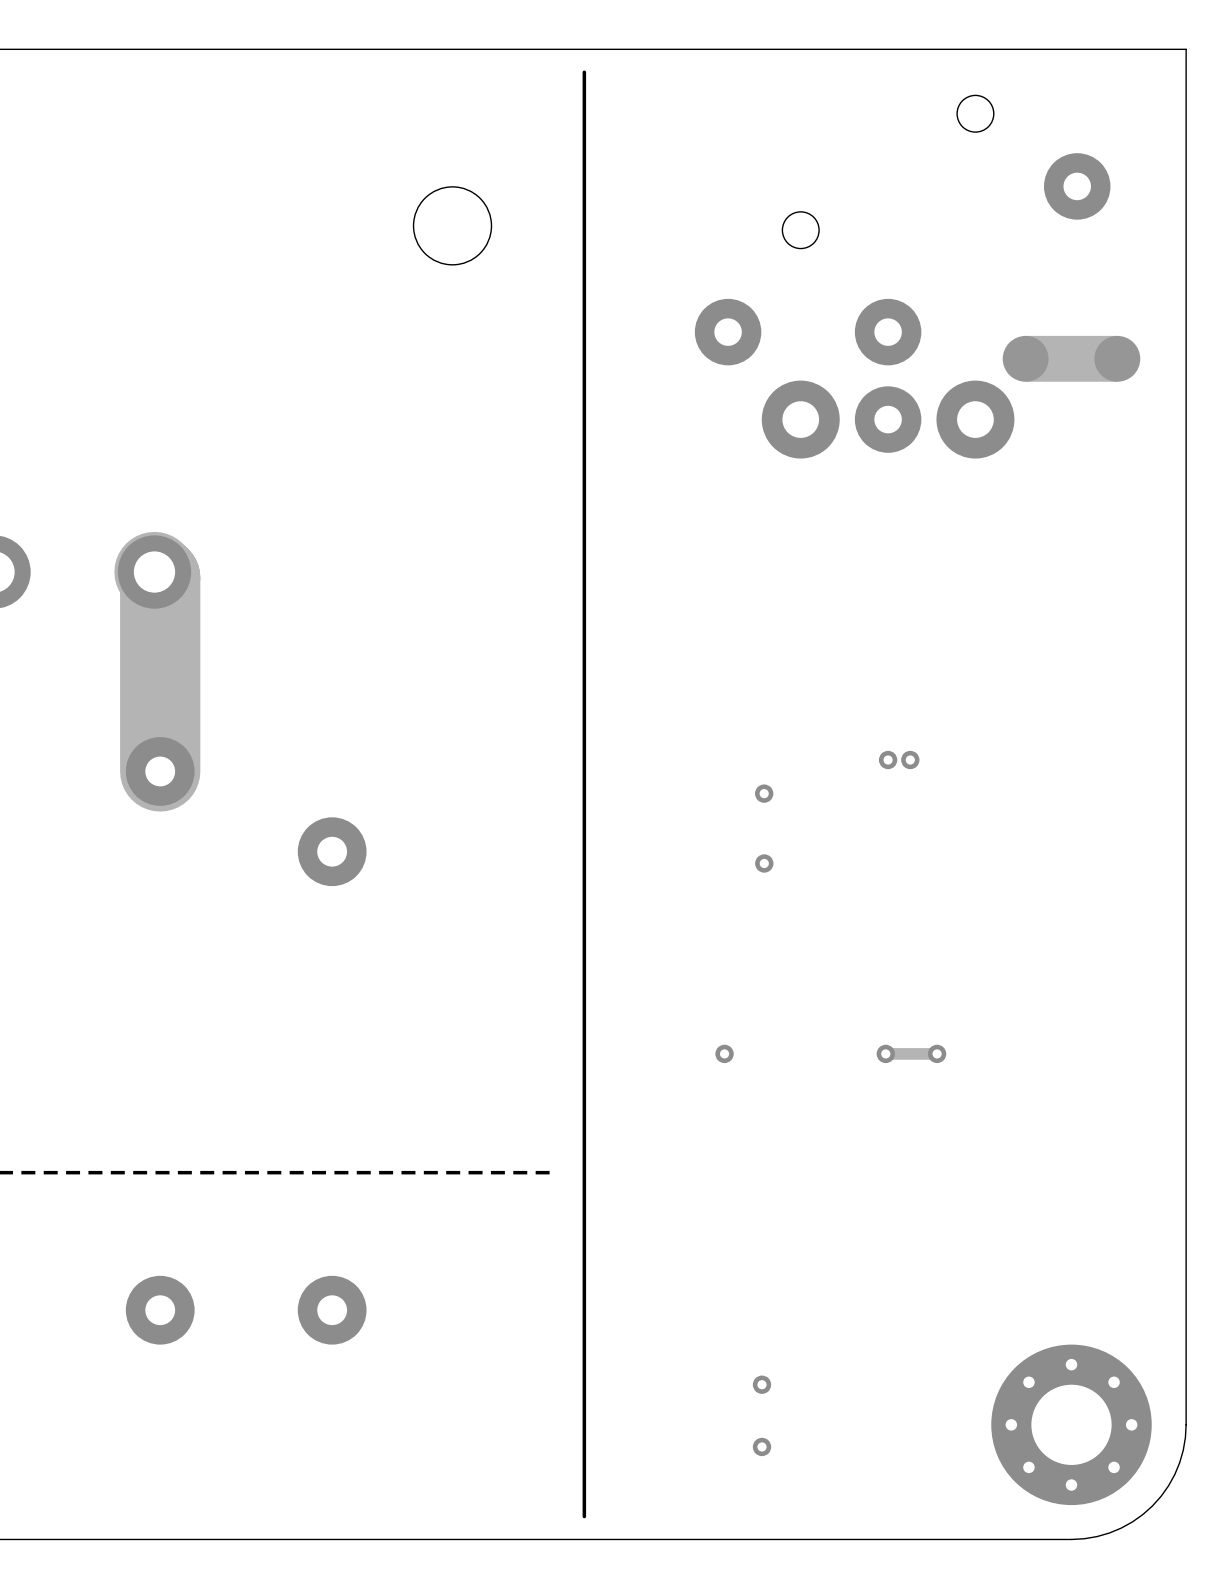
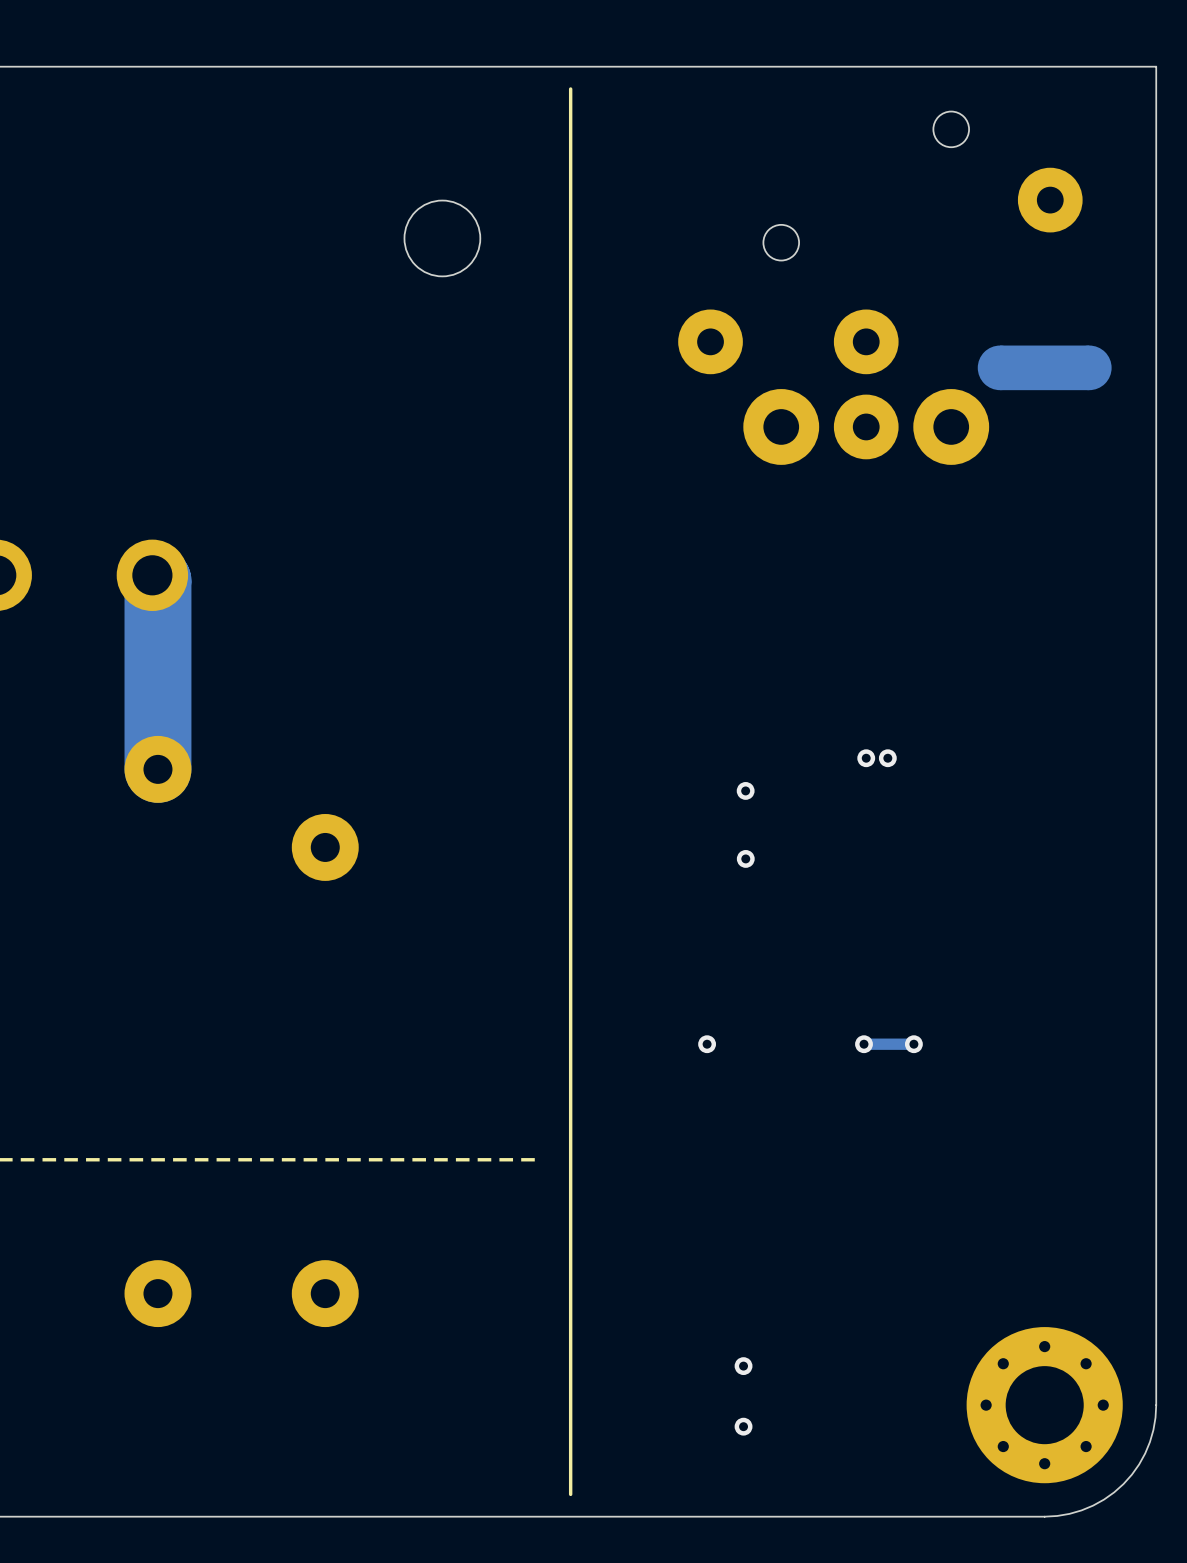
track width: thick (154, 572) (160, 577) (160, 771) -> thin (152, 575) (157, 580) (157, 769)

